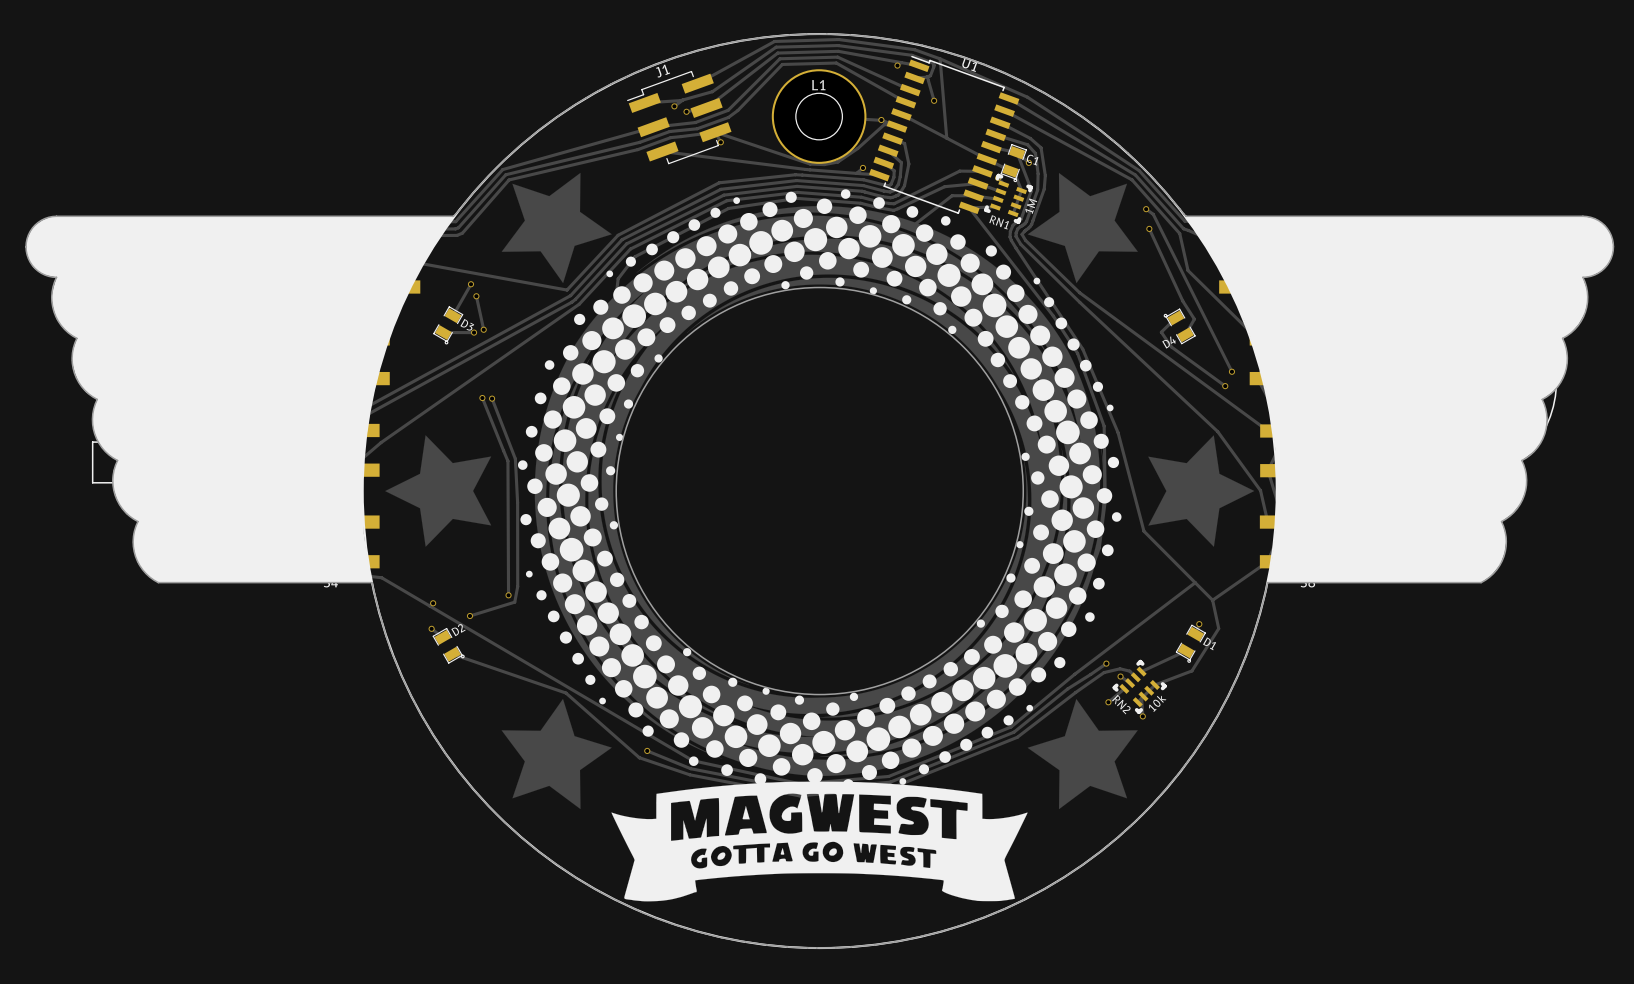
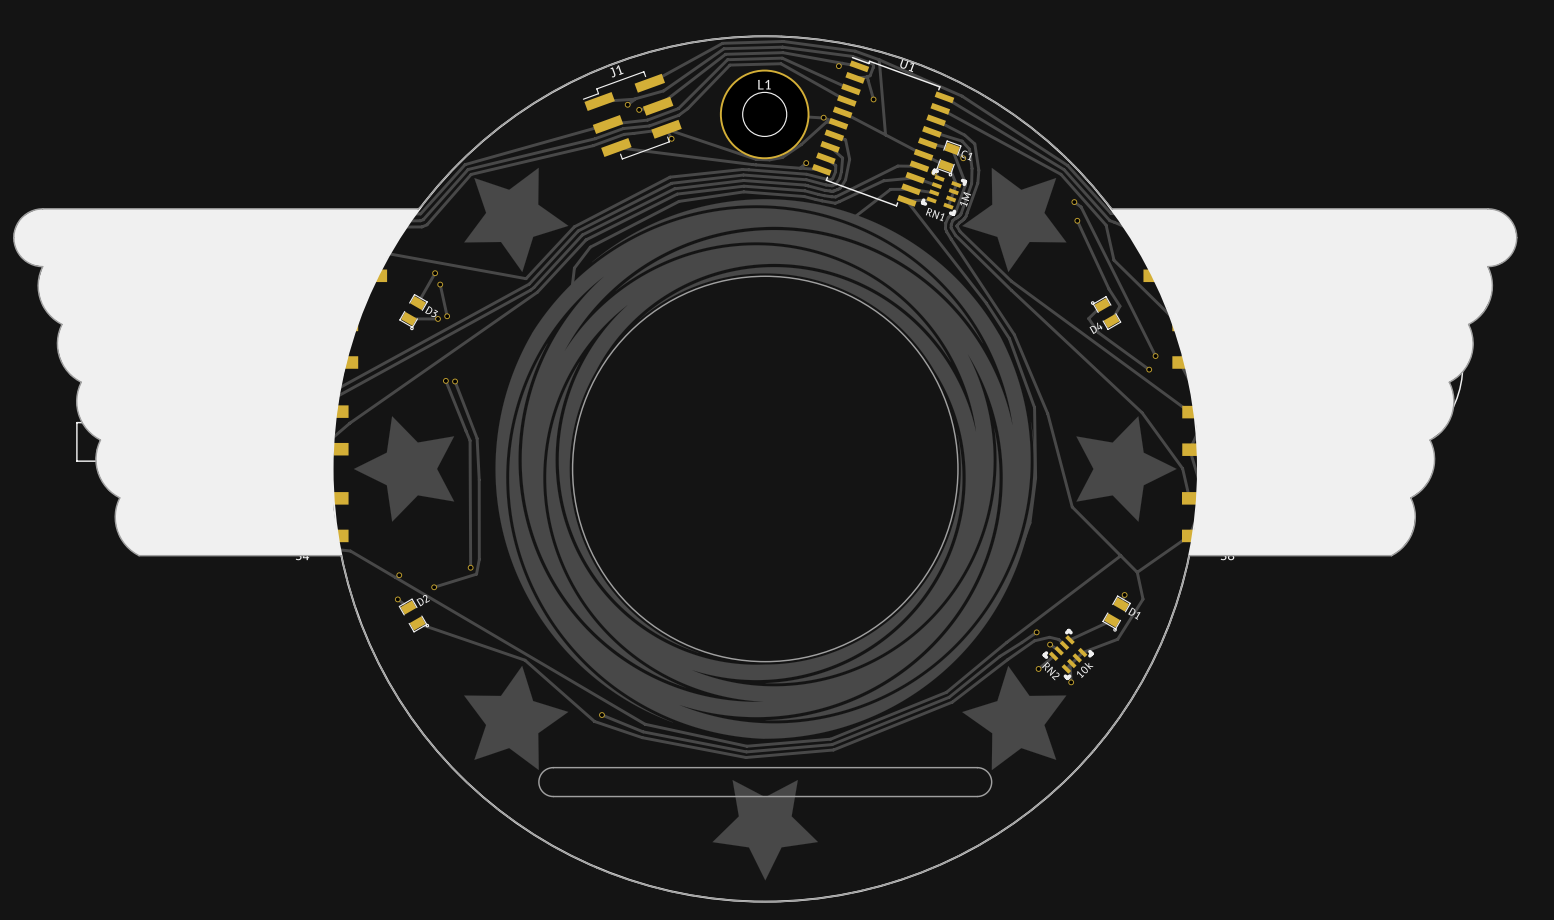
drawing: [517, 189, 1122, 902] -> none
board edge: none -> (553, 767) (977, 767) (987, 771) (991, 782) (987, 792) (977, 796) (553, 796) (543, 792) (538, 782) (543, 771) (553, 767)
drawing: none -> [712, 779, 819, 881]

